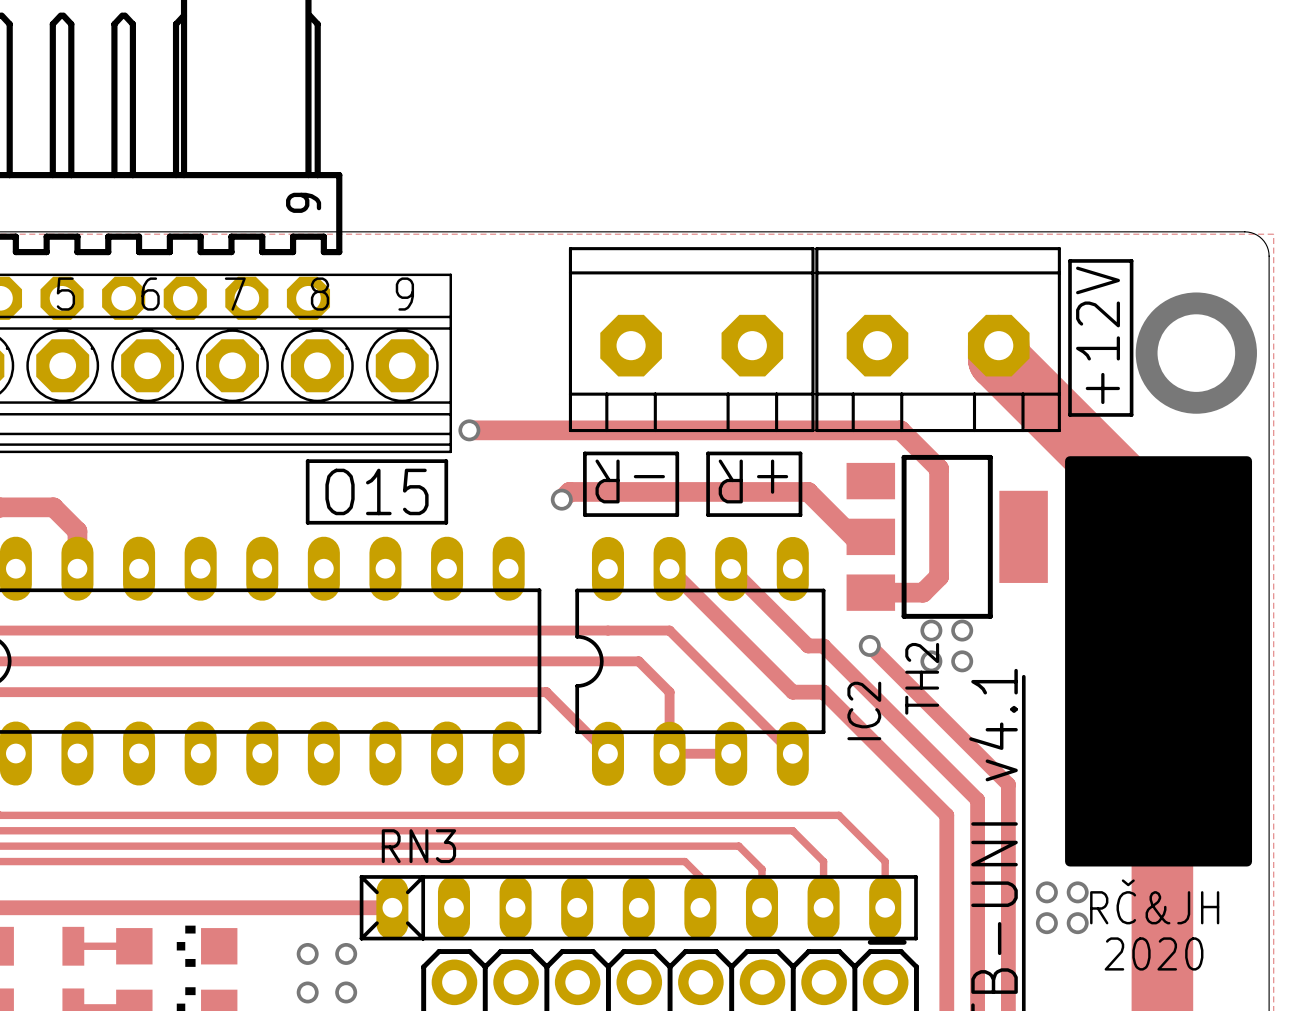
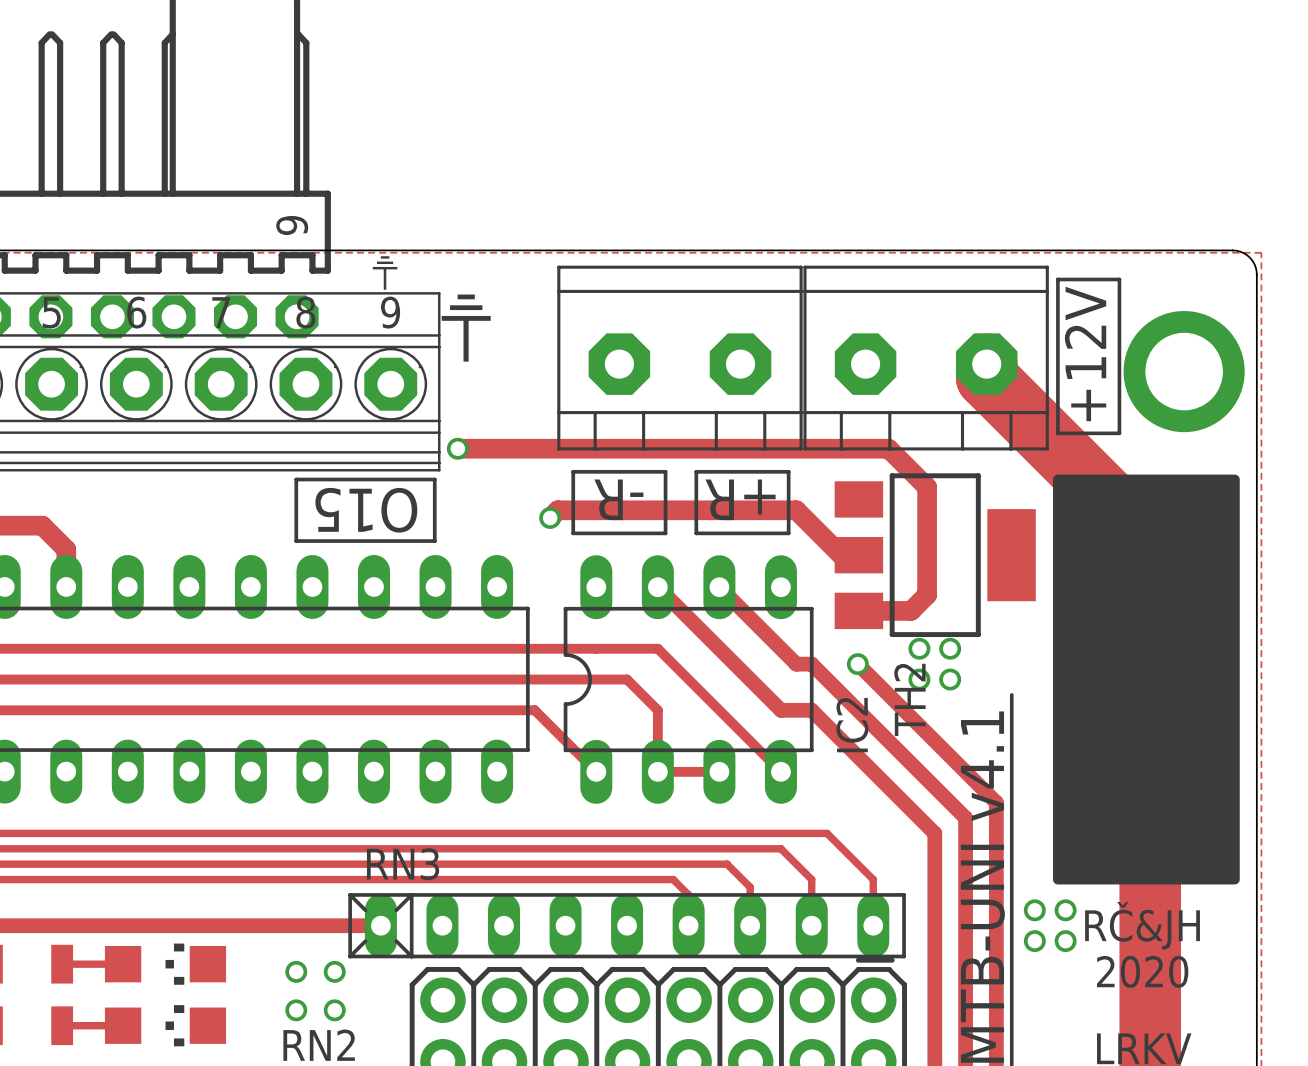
text: none -> ⏚ (385, 273)
text: none -> ⏚ (466, 328)
text rotation: 0° (376, 491) -> 180° (366, 510)

